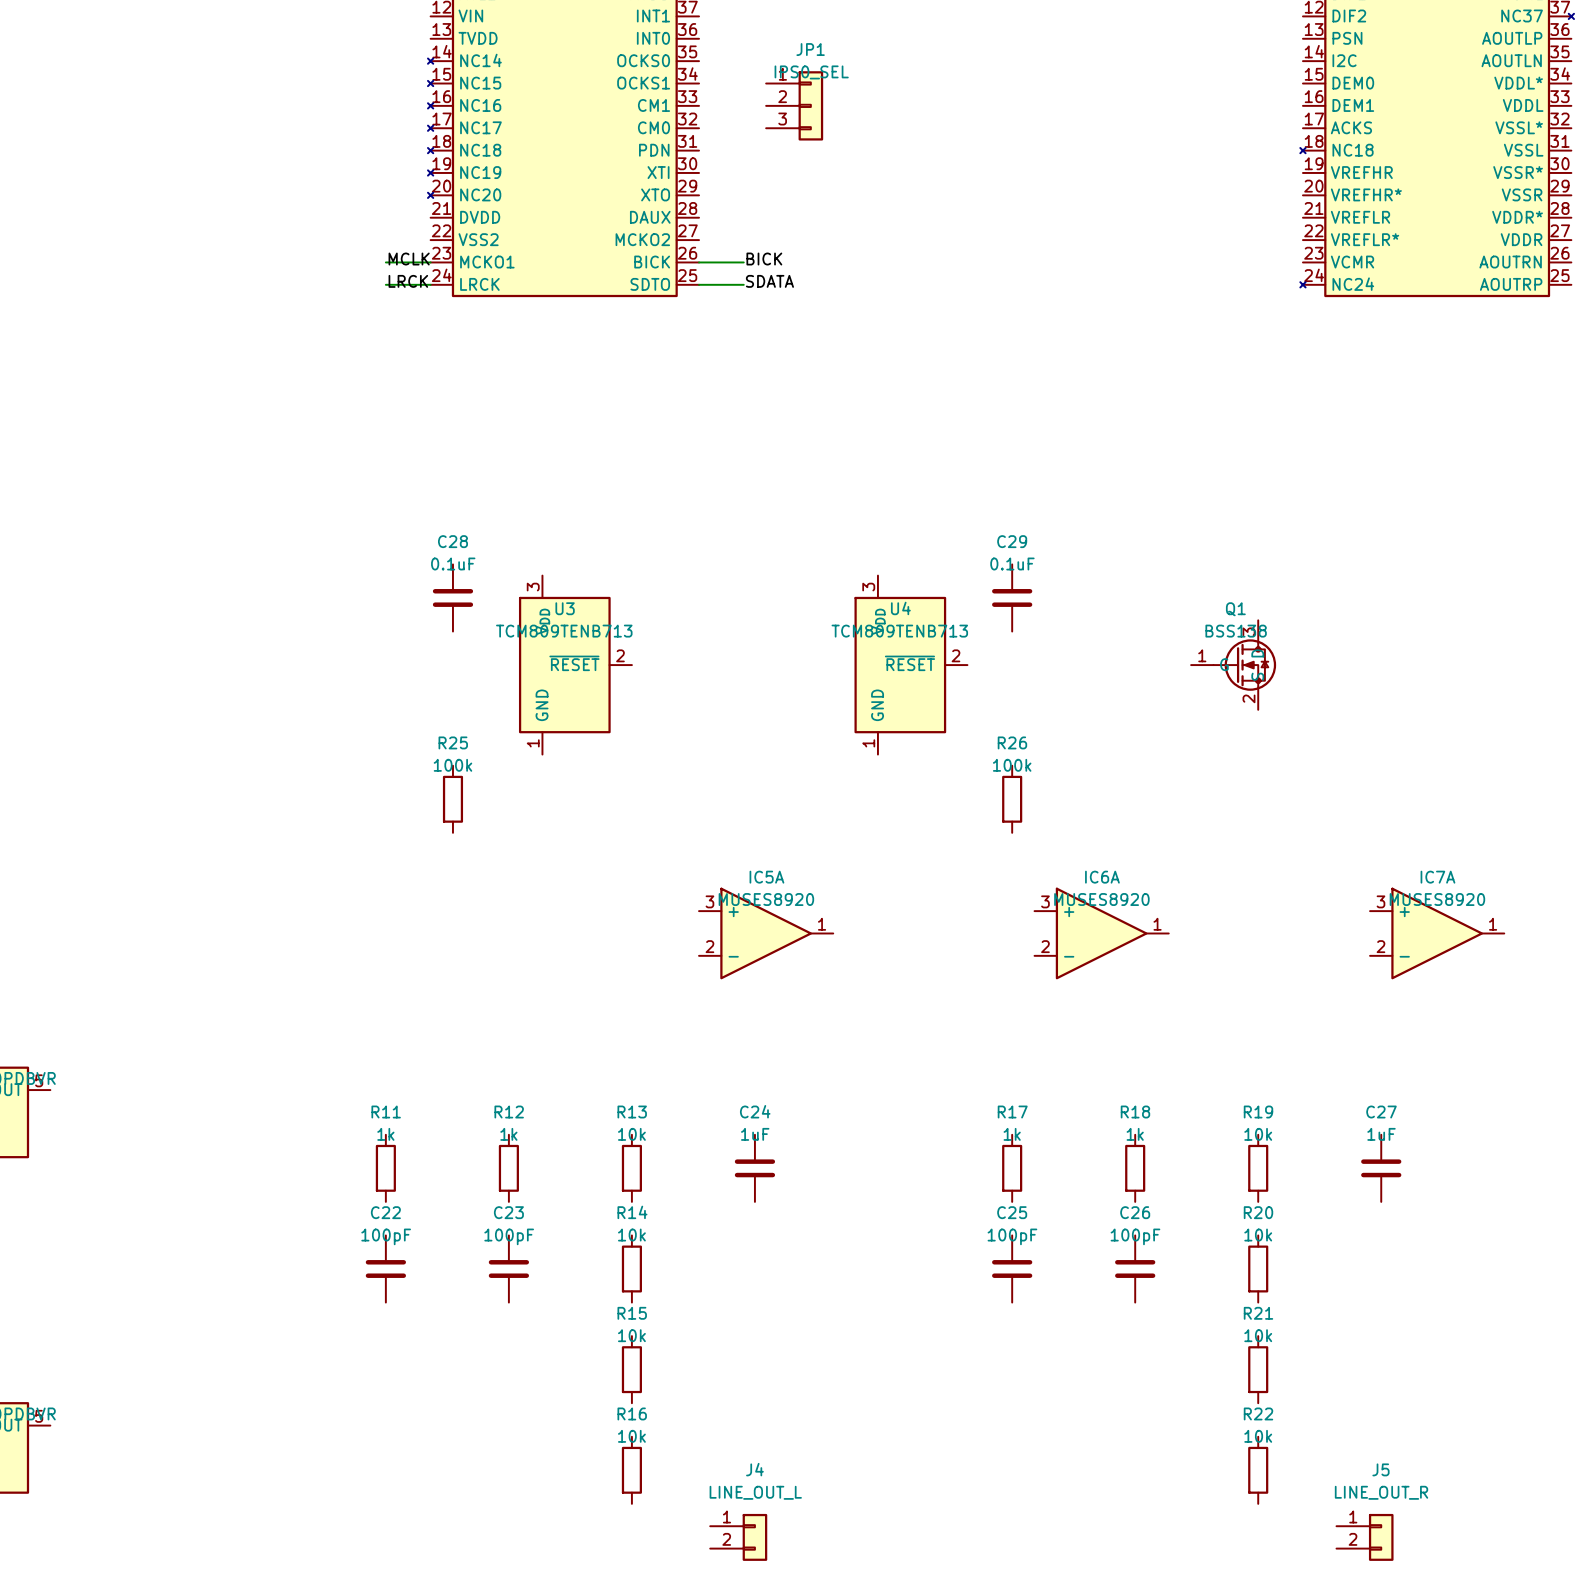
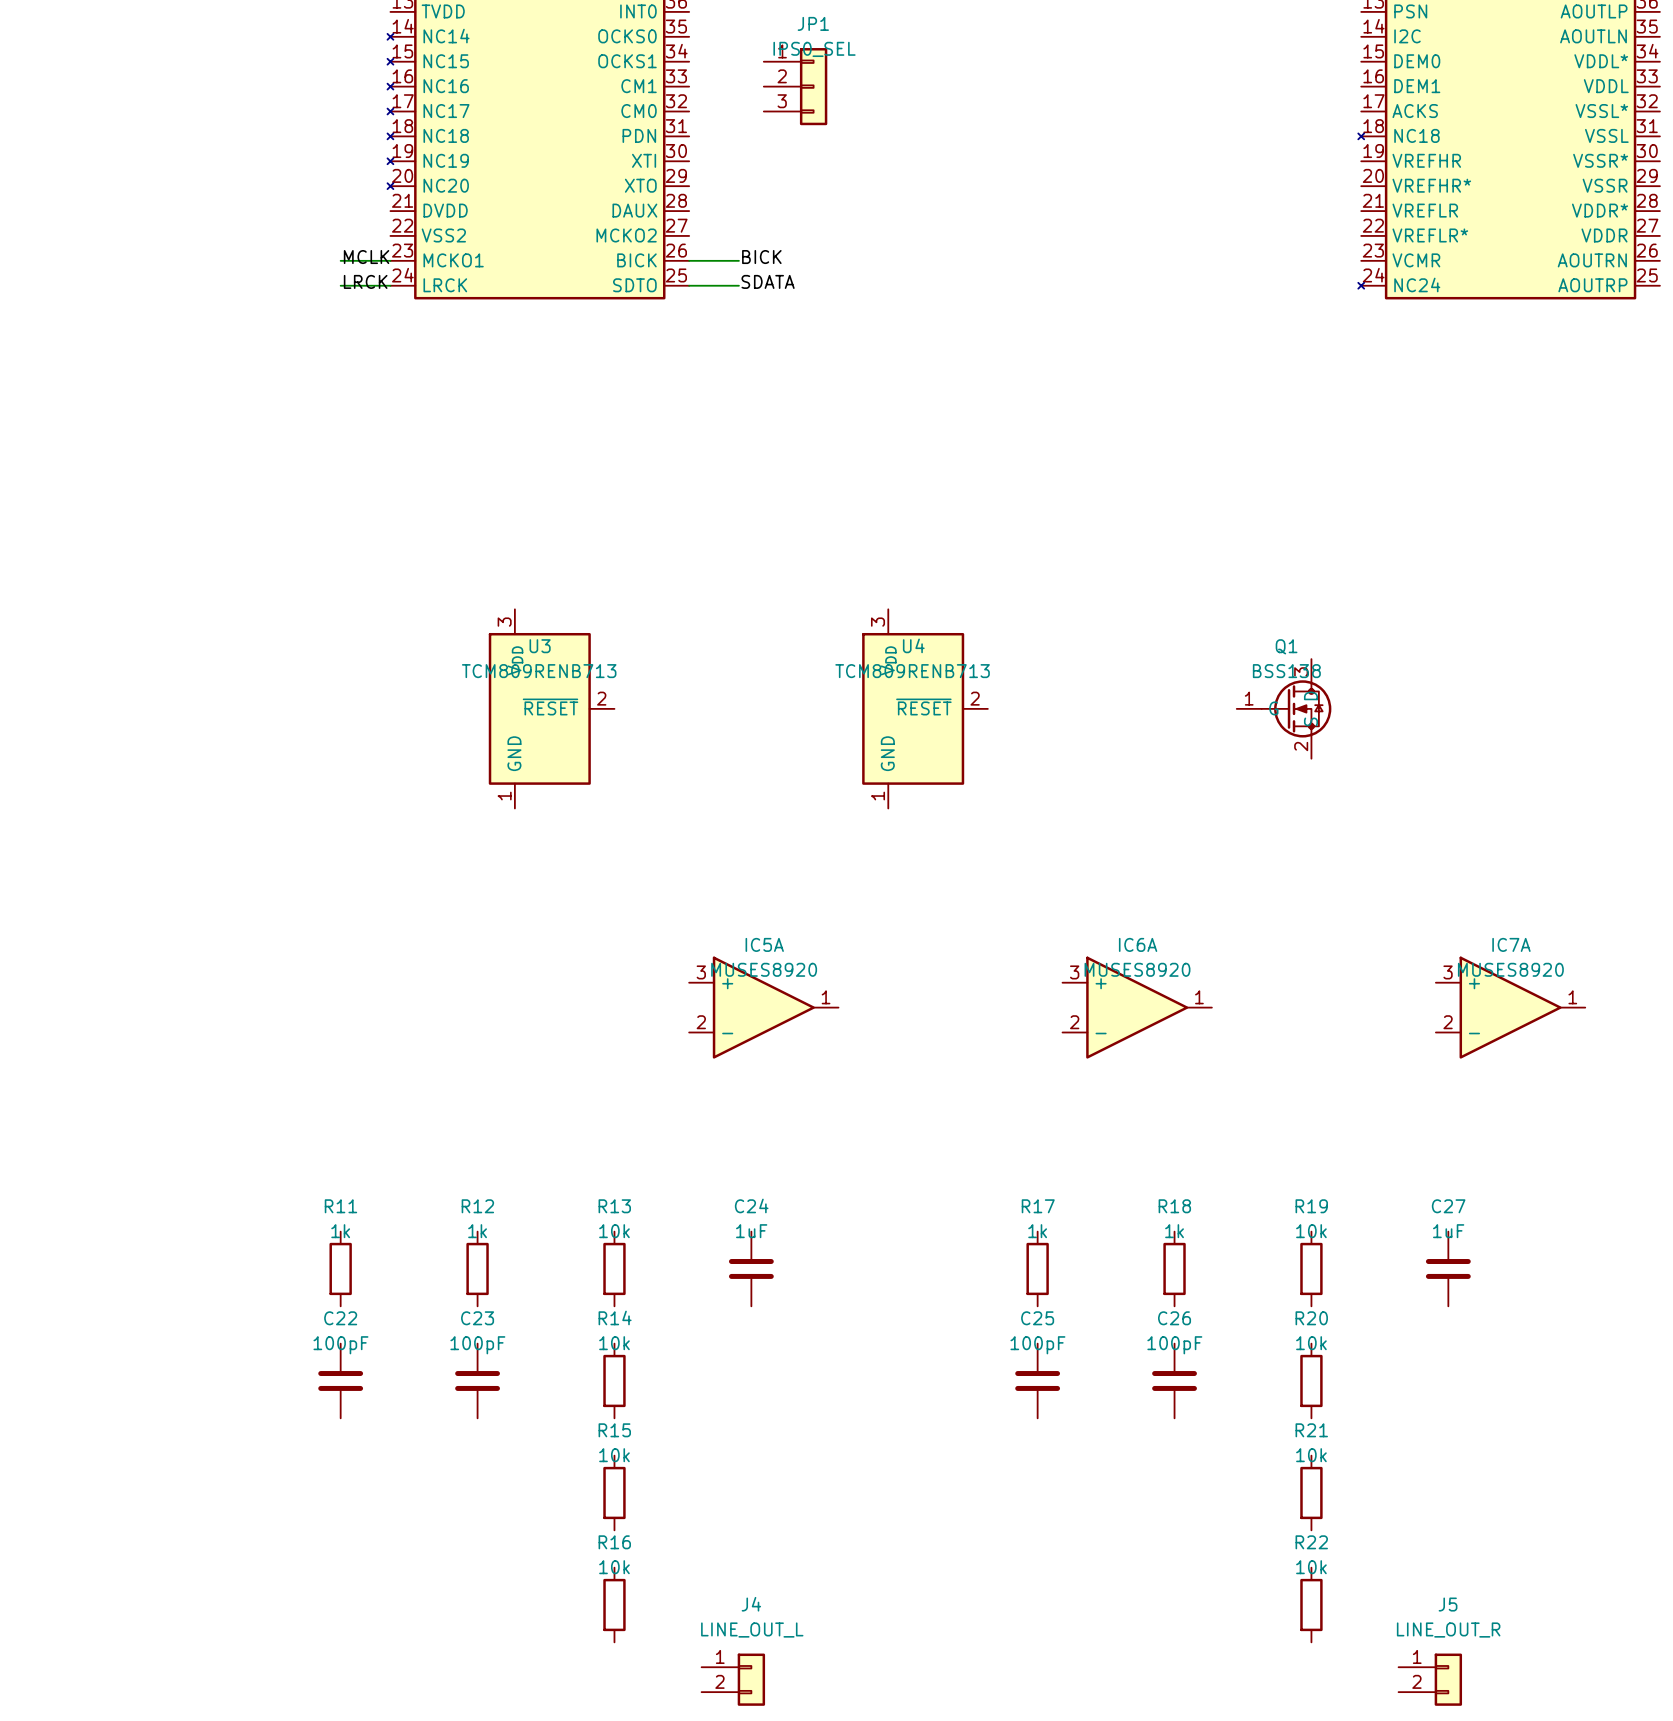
C28: 0.1uF (452, 597) -> none
C29: 0.1uF (1012, 597) -> none
U3 value: TCM809TENB713 (564, 631) -> TCM809RENB713 (539, 671)
U4 value: TCM809TENB713 (899, 631) -> TCM809RENB713 (912, 671)
R25: 100k (452, 799) -> none
R26: 100k (1012, 799) -> none

